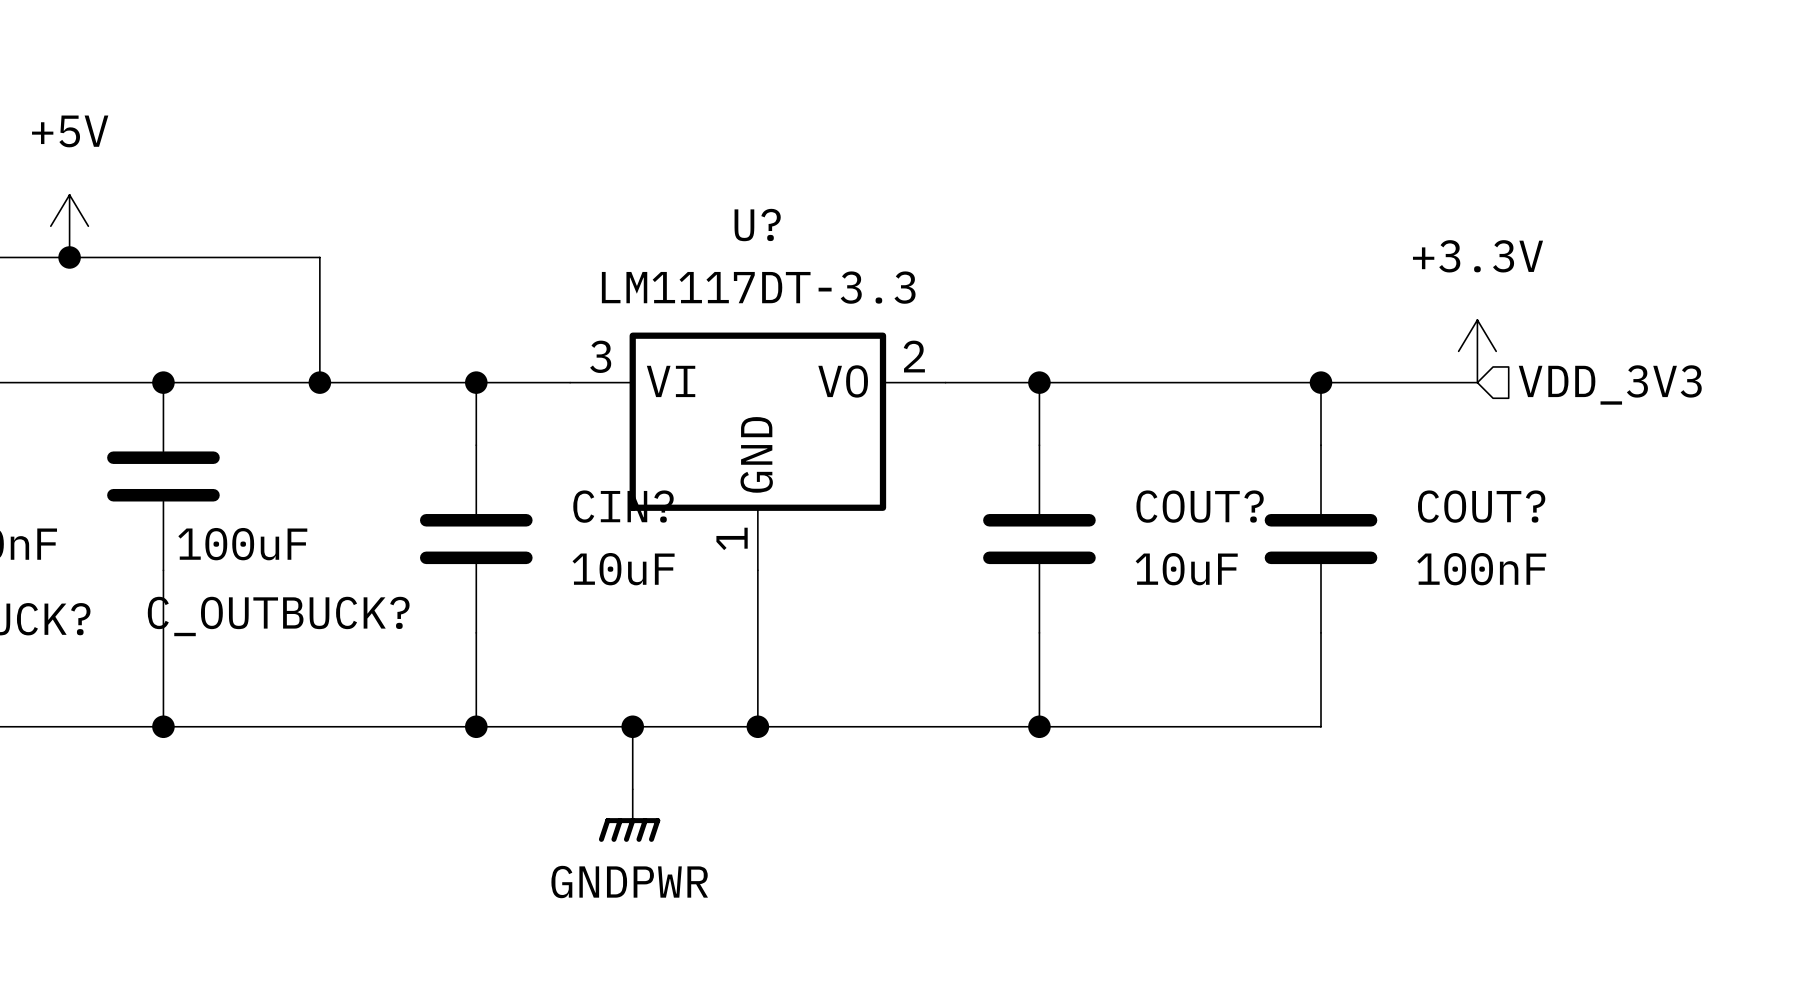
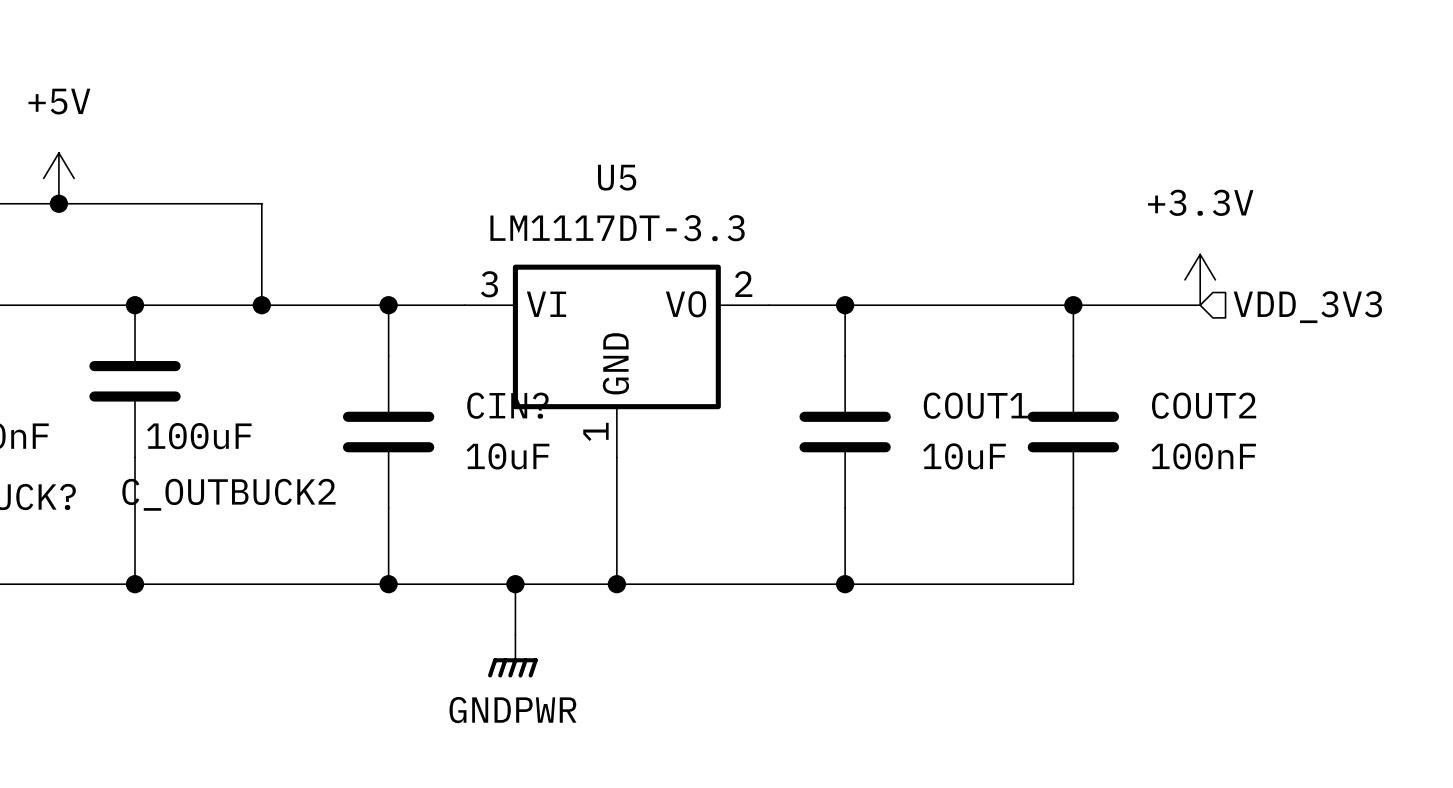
U? name: U? (757, 225) -> U5 (617, 177)
COUT? name: COUT? (1200, 506) -> COUT1 (976, 405)
COUT? name: COUT? (1481, 506) -> COUT2 (1204, 405)
C_OUTBUCK? name: C_OUTBUCK? (278, 616) -> C_OUTBUCK2 (228, 494)

